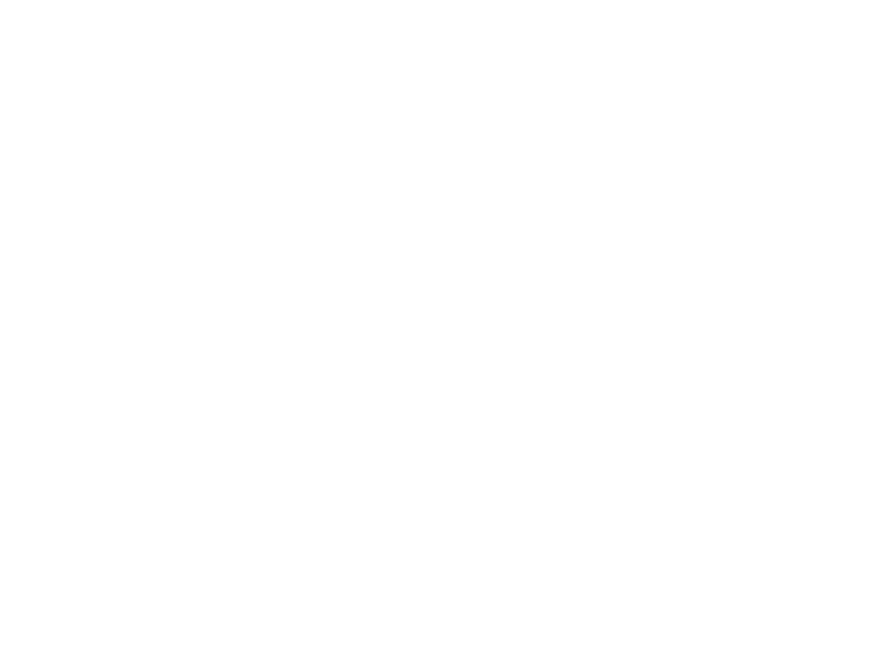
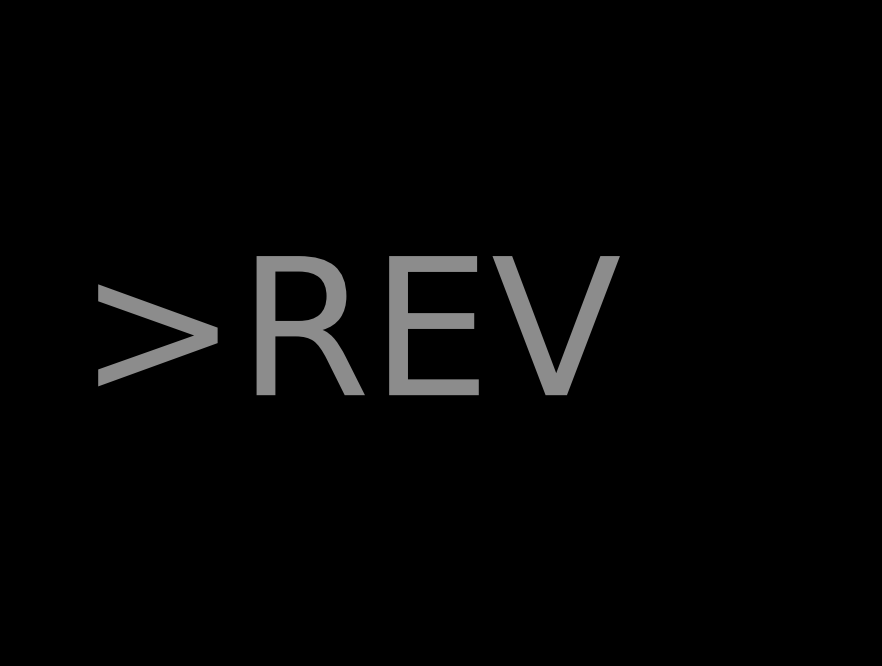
text: none -> >REV (359, 325)

